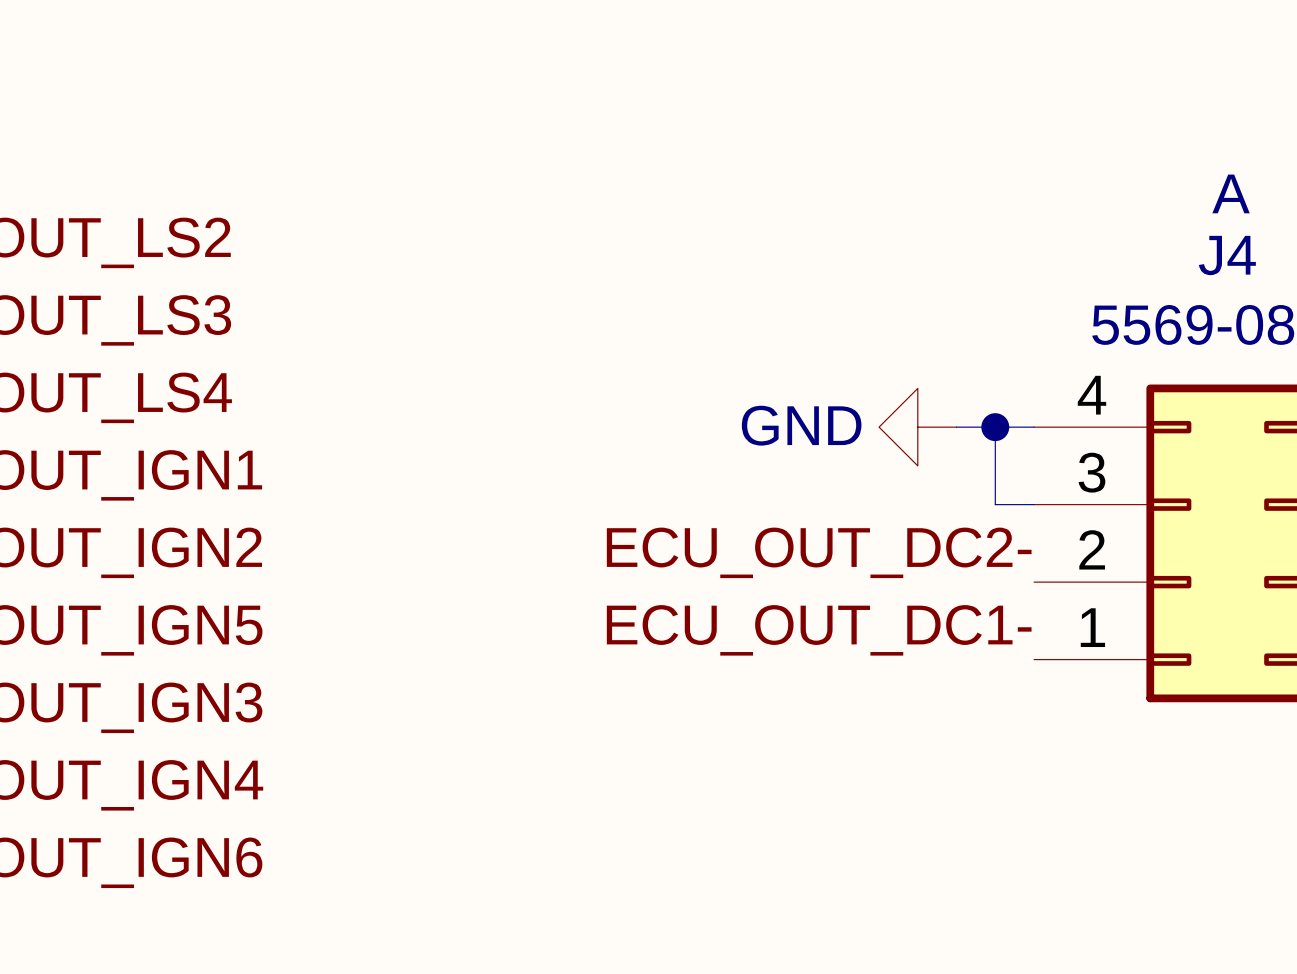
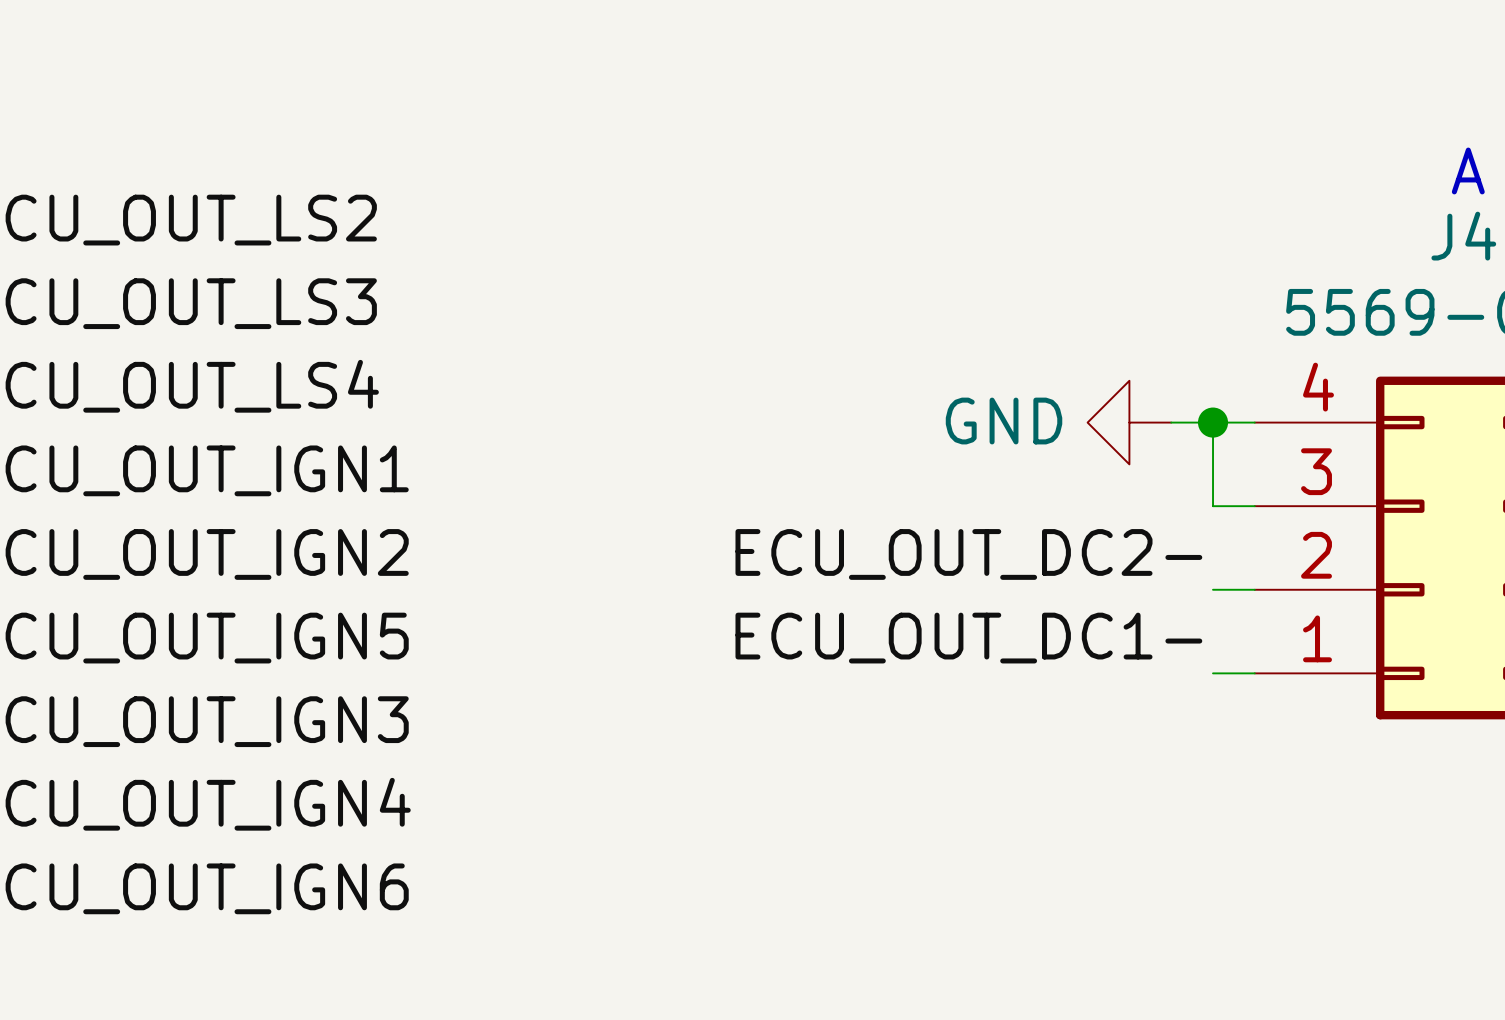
label position: ECU_OUT_DC2- (819, 552) -> ECU_OUT_DC2- (968, 554)
wire: none -> (1213, 589) (1254, 589)
label position: ECU_OUT_DC1- (819, 630) -> ECU_OUT_DC1- (968, 638)
wire: none -> (1213, 673) (1254, 673)

